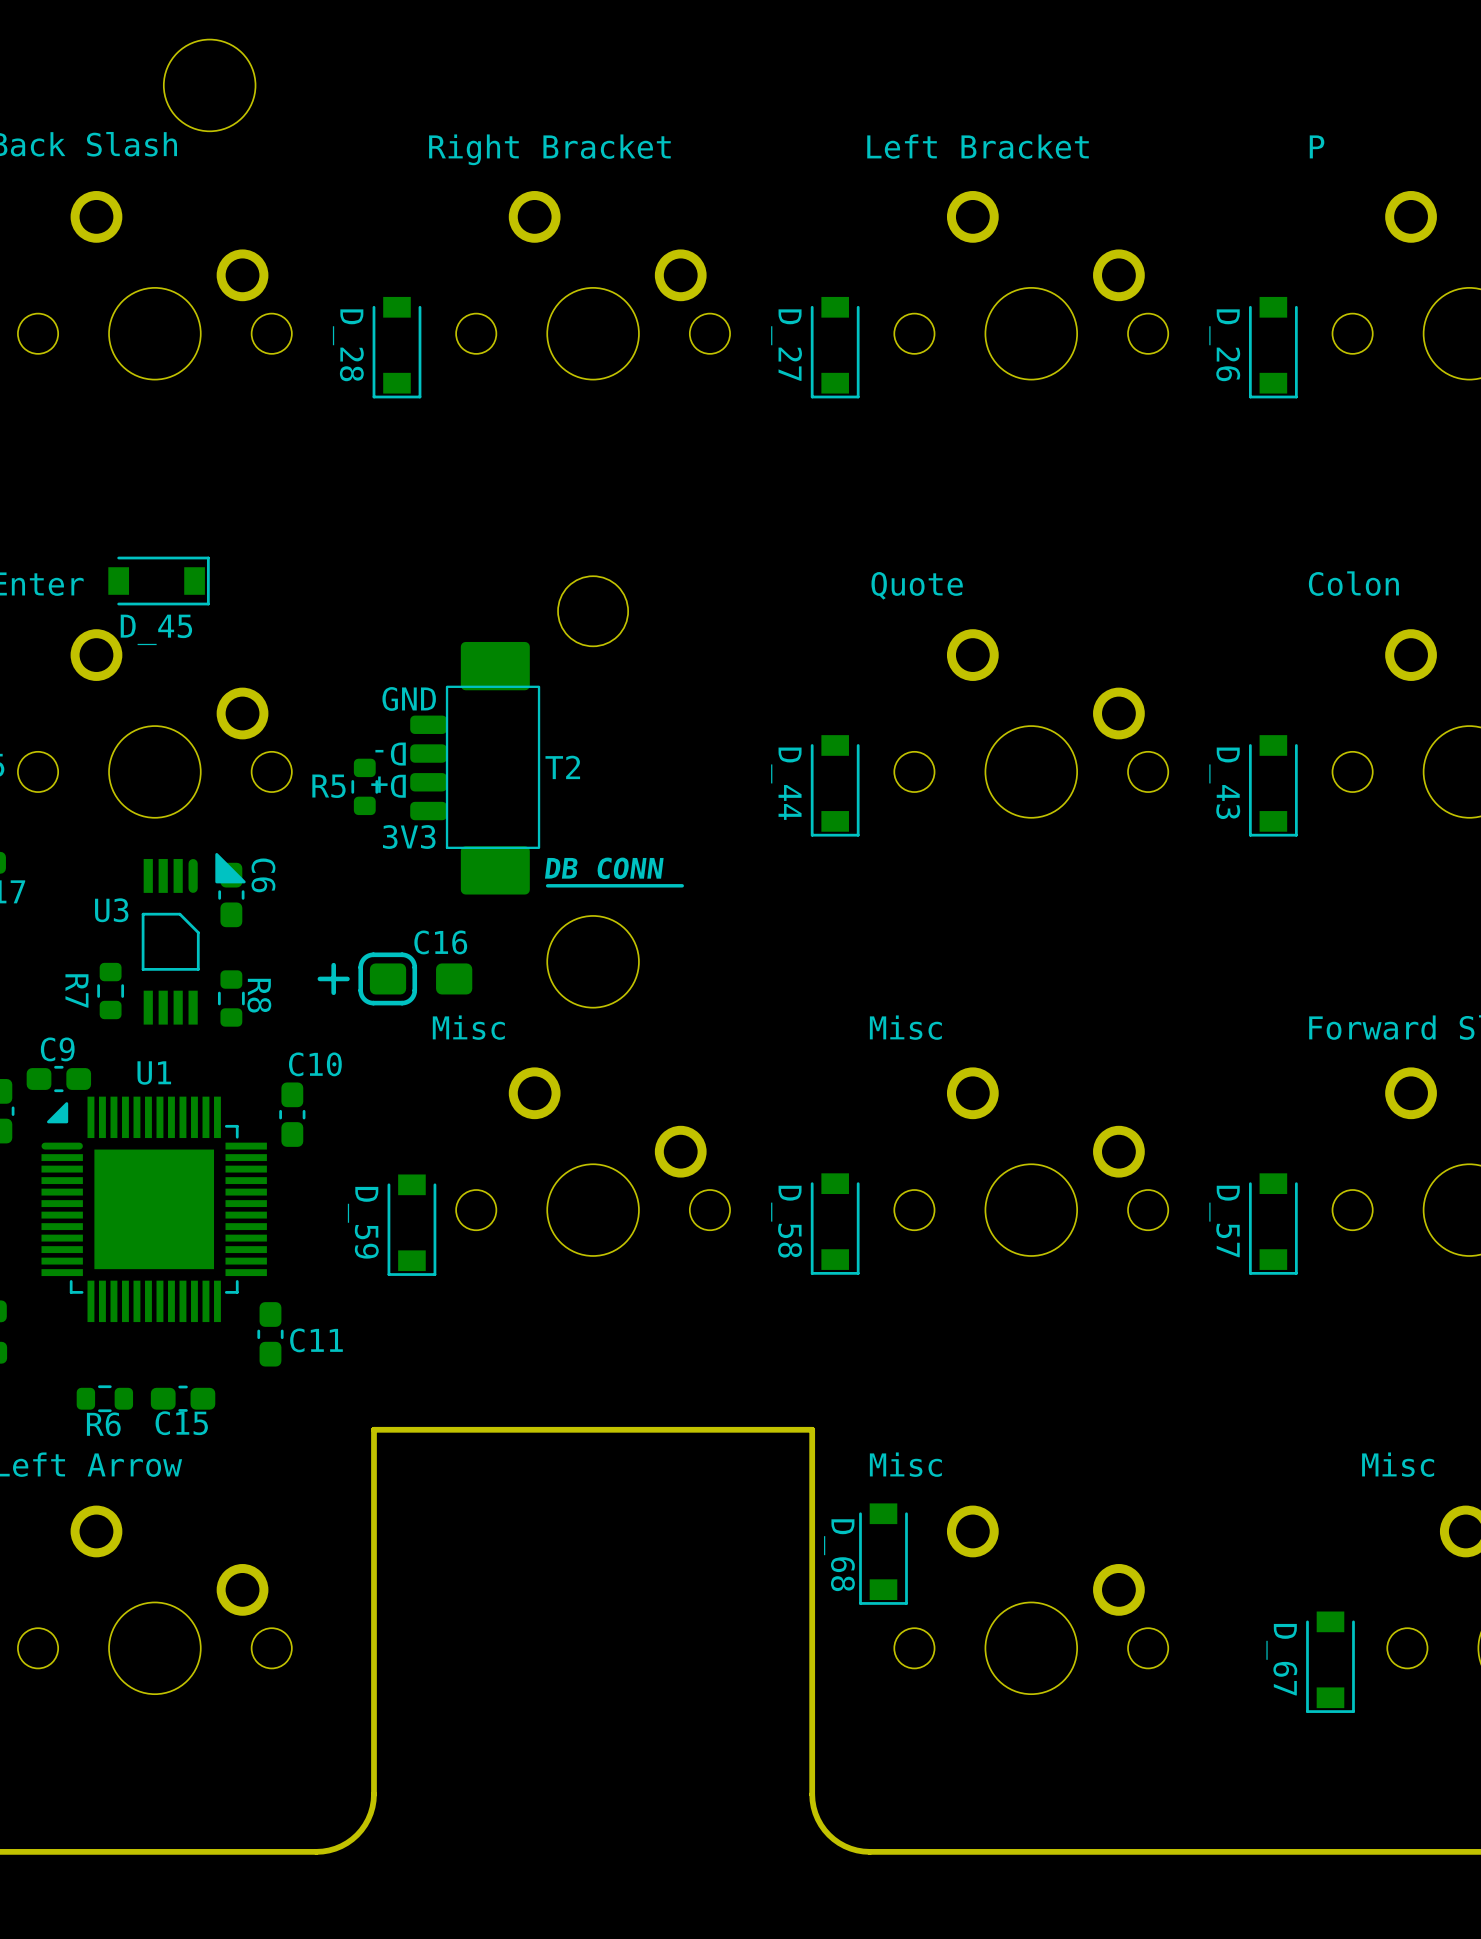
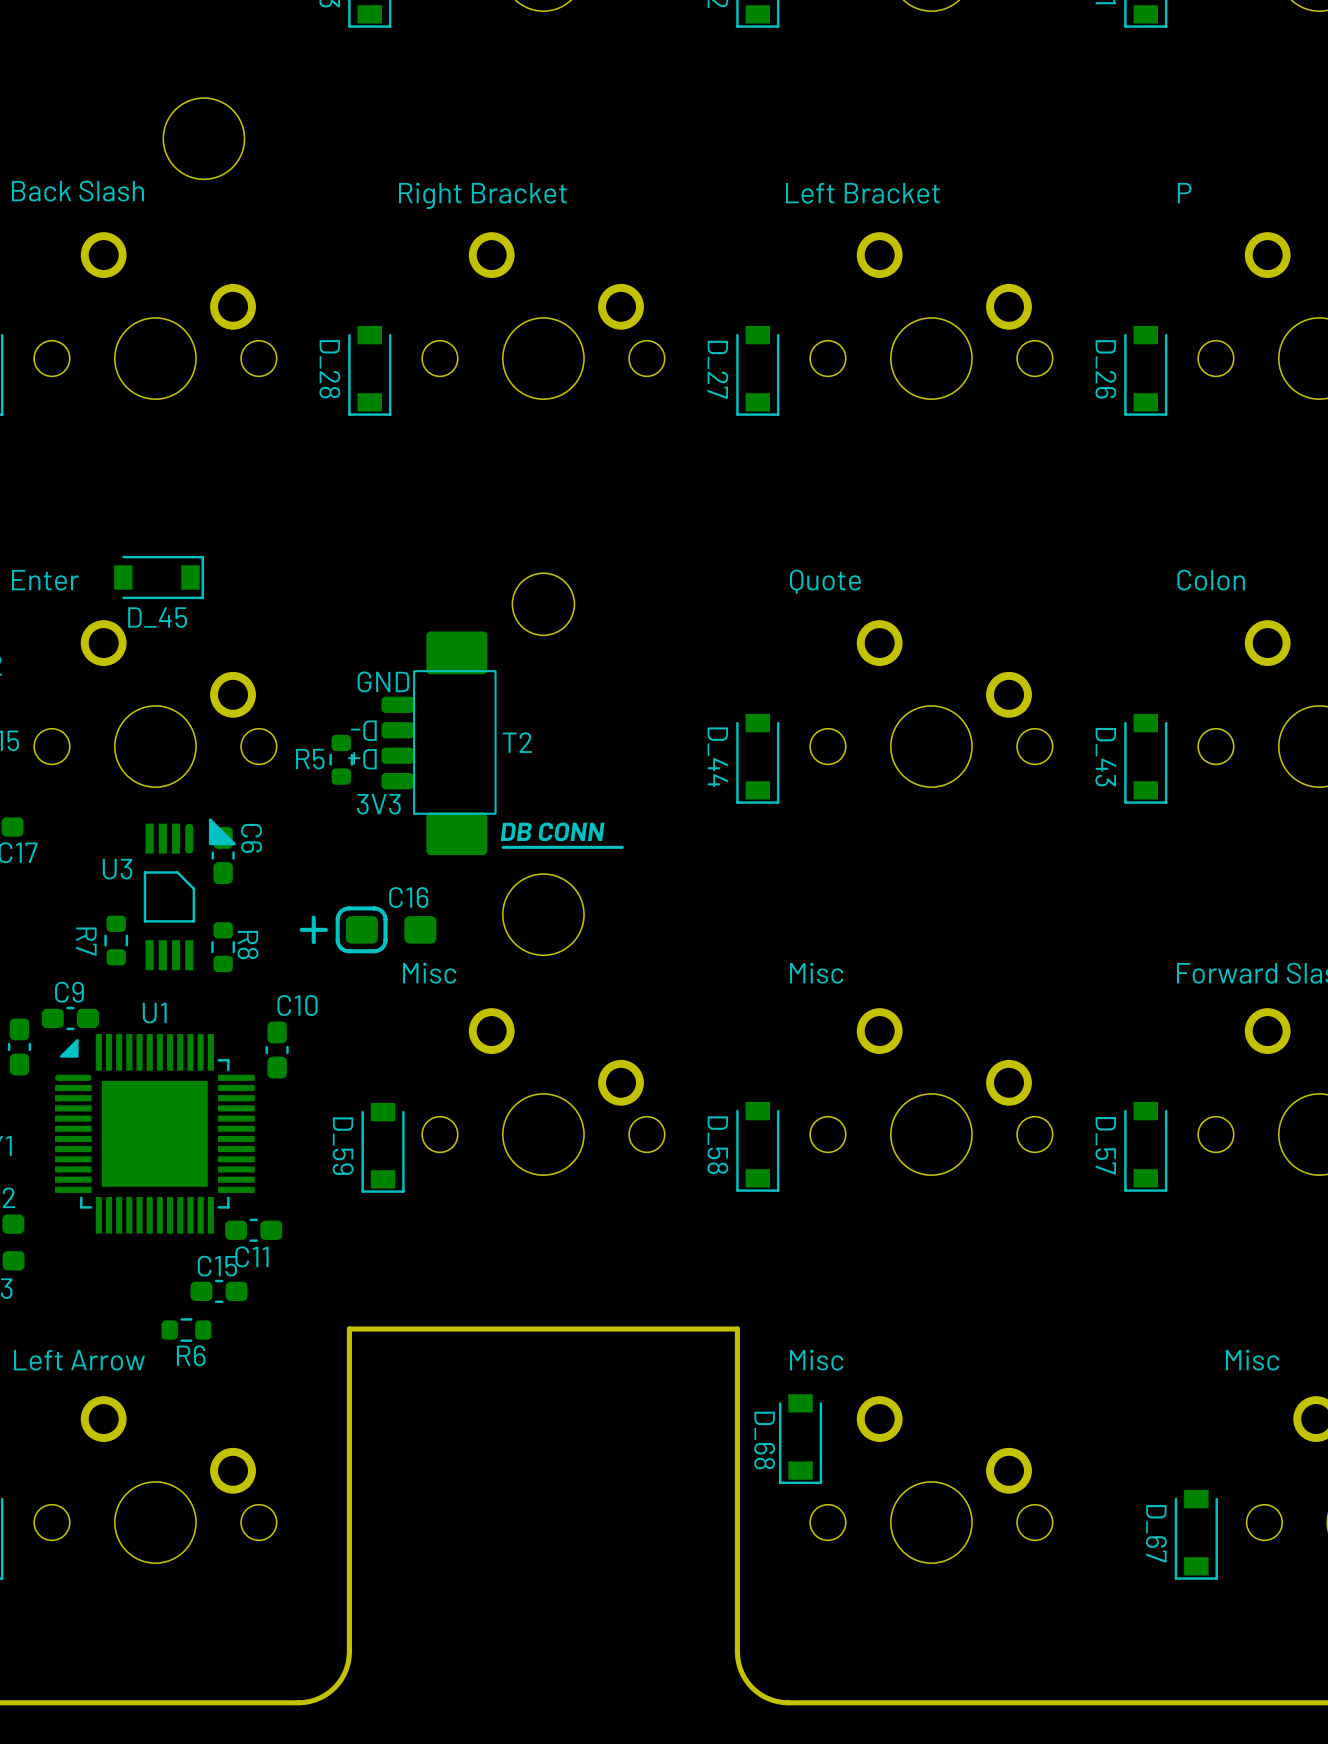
C11 rotation: 0° (270, 1334) -> 90° clockwise (253, 1230)
R6 position: (104, 1398) -> (186, 1330)
C15 position: (183, 1398) -> (219, 1291)
C15 name position: C15 (181, 1423) -> C15 (217, 1266)
R6 name position: R6 (103, 1424) -> R6 (191, 1355)

